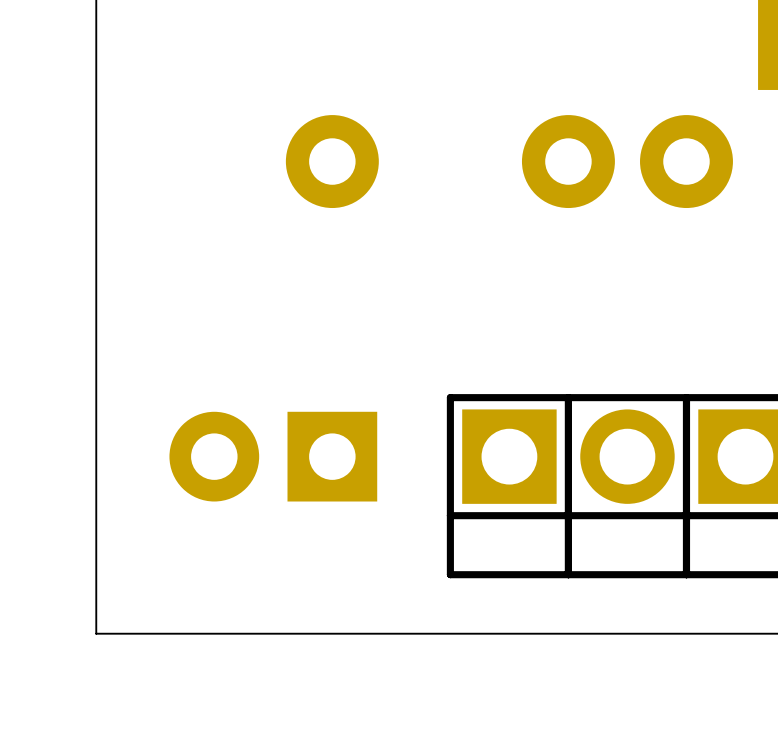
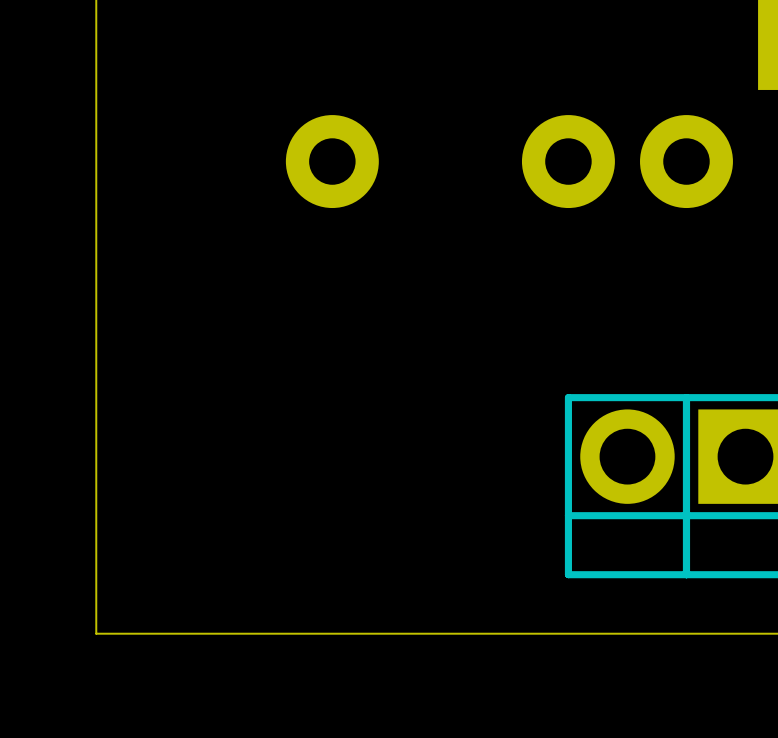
part: (273, 456) -> none
part: (509, 486) -> none

